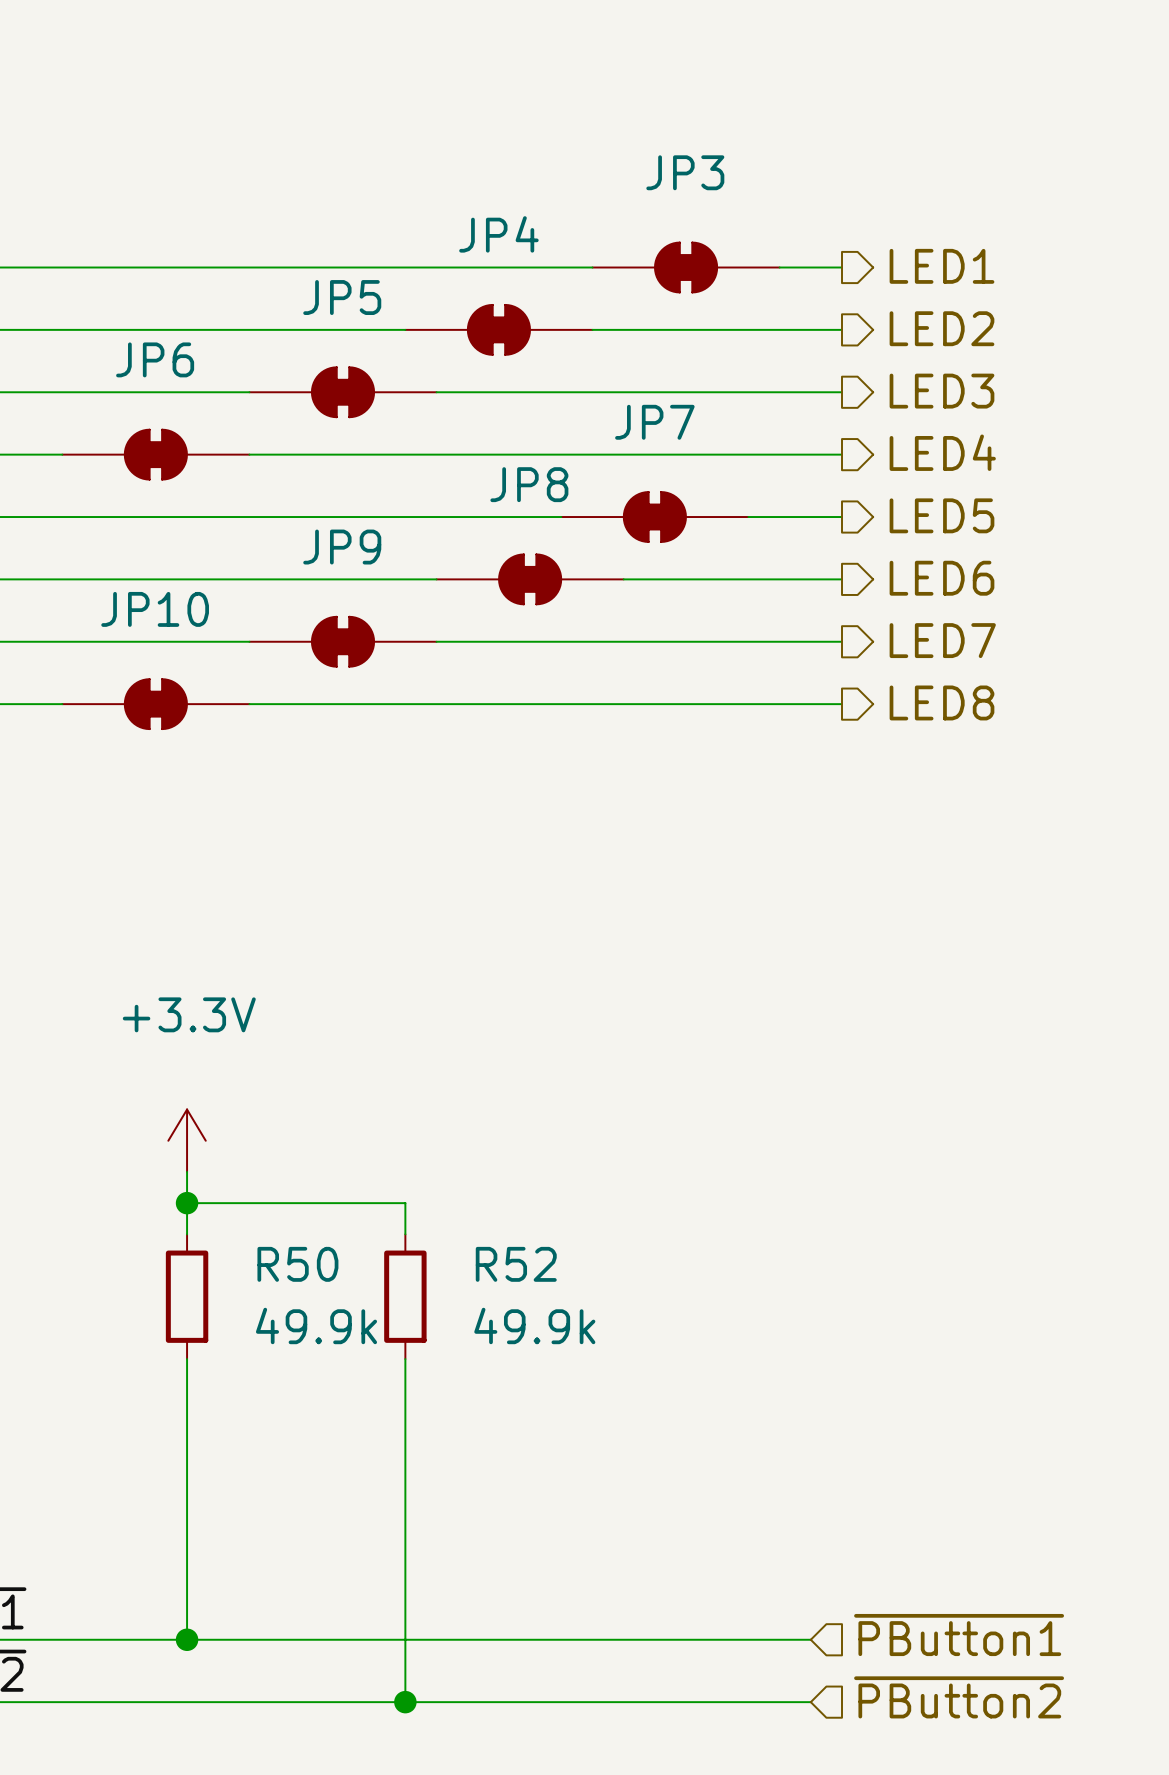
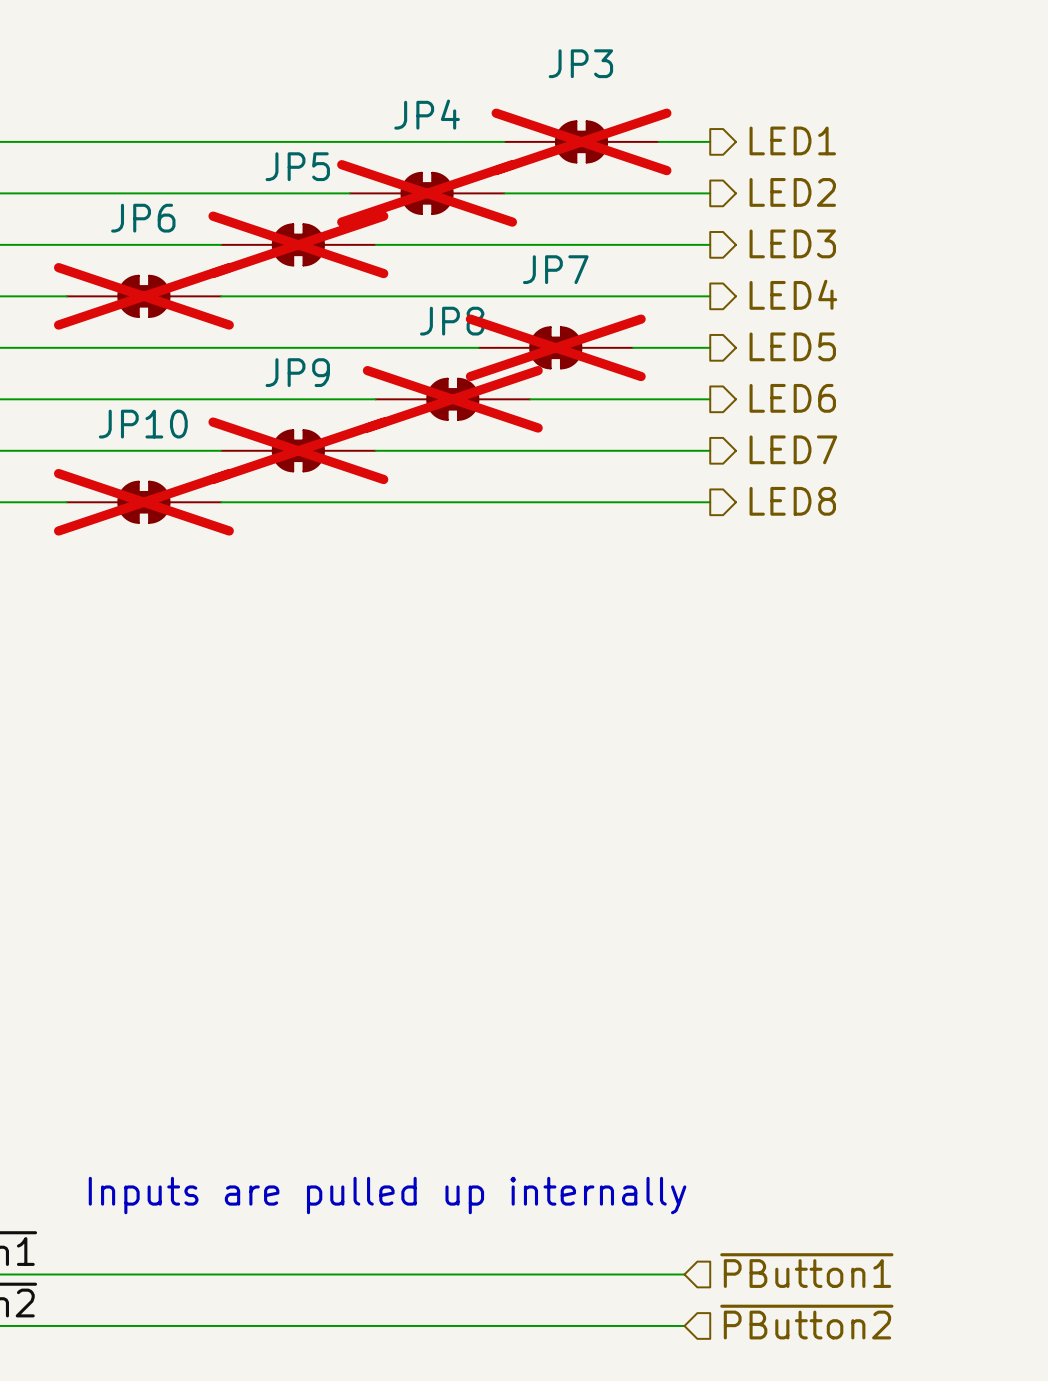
JP3 do-not-place cross: none -> (581, 141)
JP4 do-not-place cross: none -> (427, 193)
JP5 do-not-place cross: none -> (298, 244)
JP6 do-not-place cross: none -> (143, 296)
JP7 do-not-place cross: none -> (555, 347)
JP8 do-not-place cross: none -> (452, 399)
JP9 do-not-place cross: none -> (298, 450)
JP10 do-not-place cross: none -> (143, 502)
power symbol: +3.3V (187, 1140) -> none
wire: (187, 1171) (187, 1234) -> none
wire: (187, 1203) (405, 1203) (405, 1234) -> none
junction: (187, 1203) -> none
R50: 49.9k (187, 1296) -> none
R52: 49.9k (405, 1296) -> none
wire: (187, 1359) (187, 1639) -> none
wire: (405, 1359) (405, 1702) -> none
text: none -> Inputs are pulled up internally (387, 1195)
junction: (187, 1639) -> none
junction: (405, 1702) -> none

